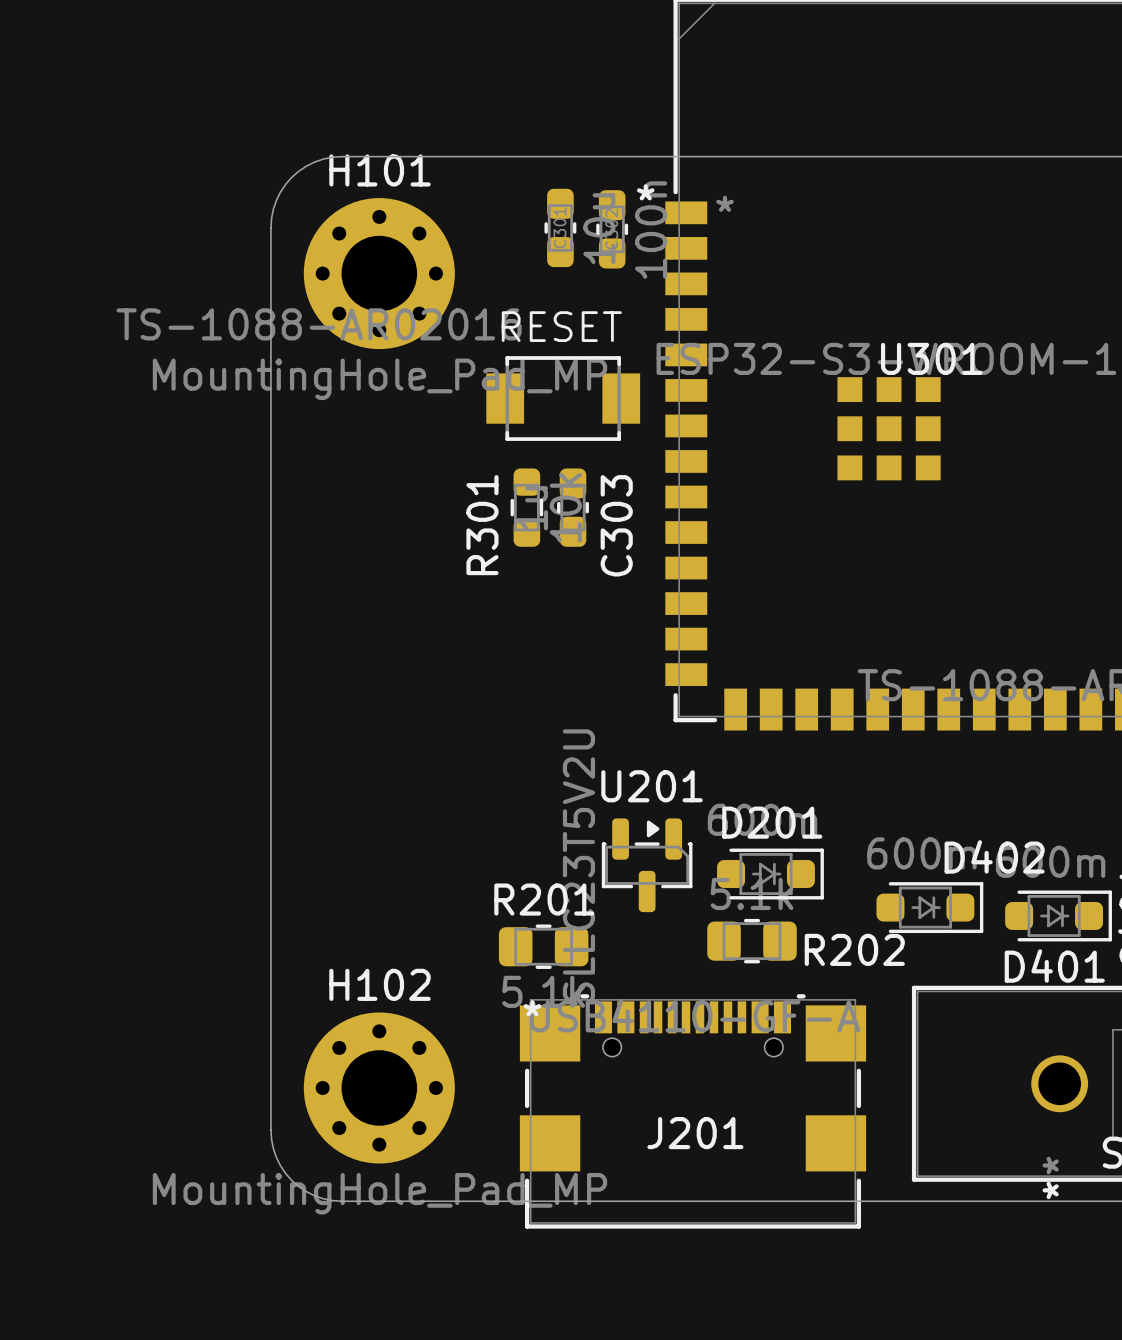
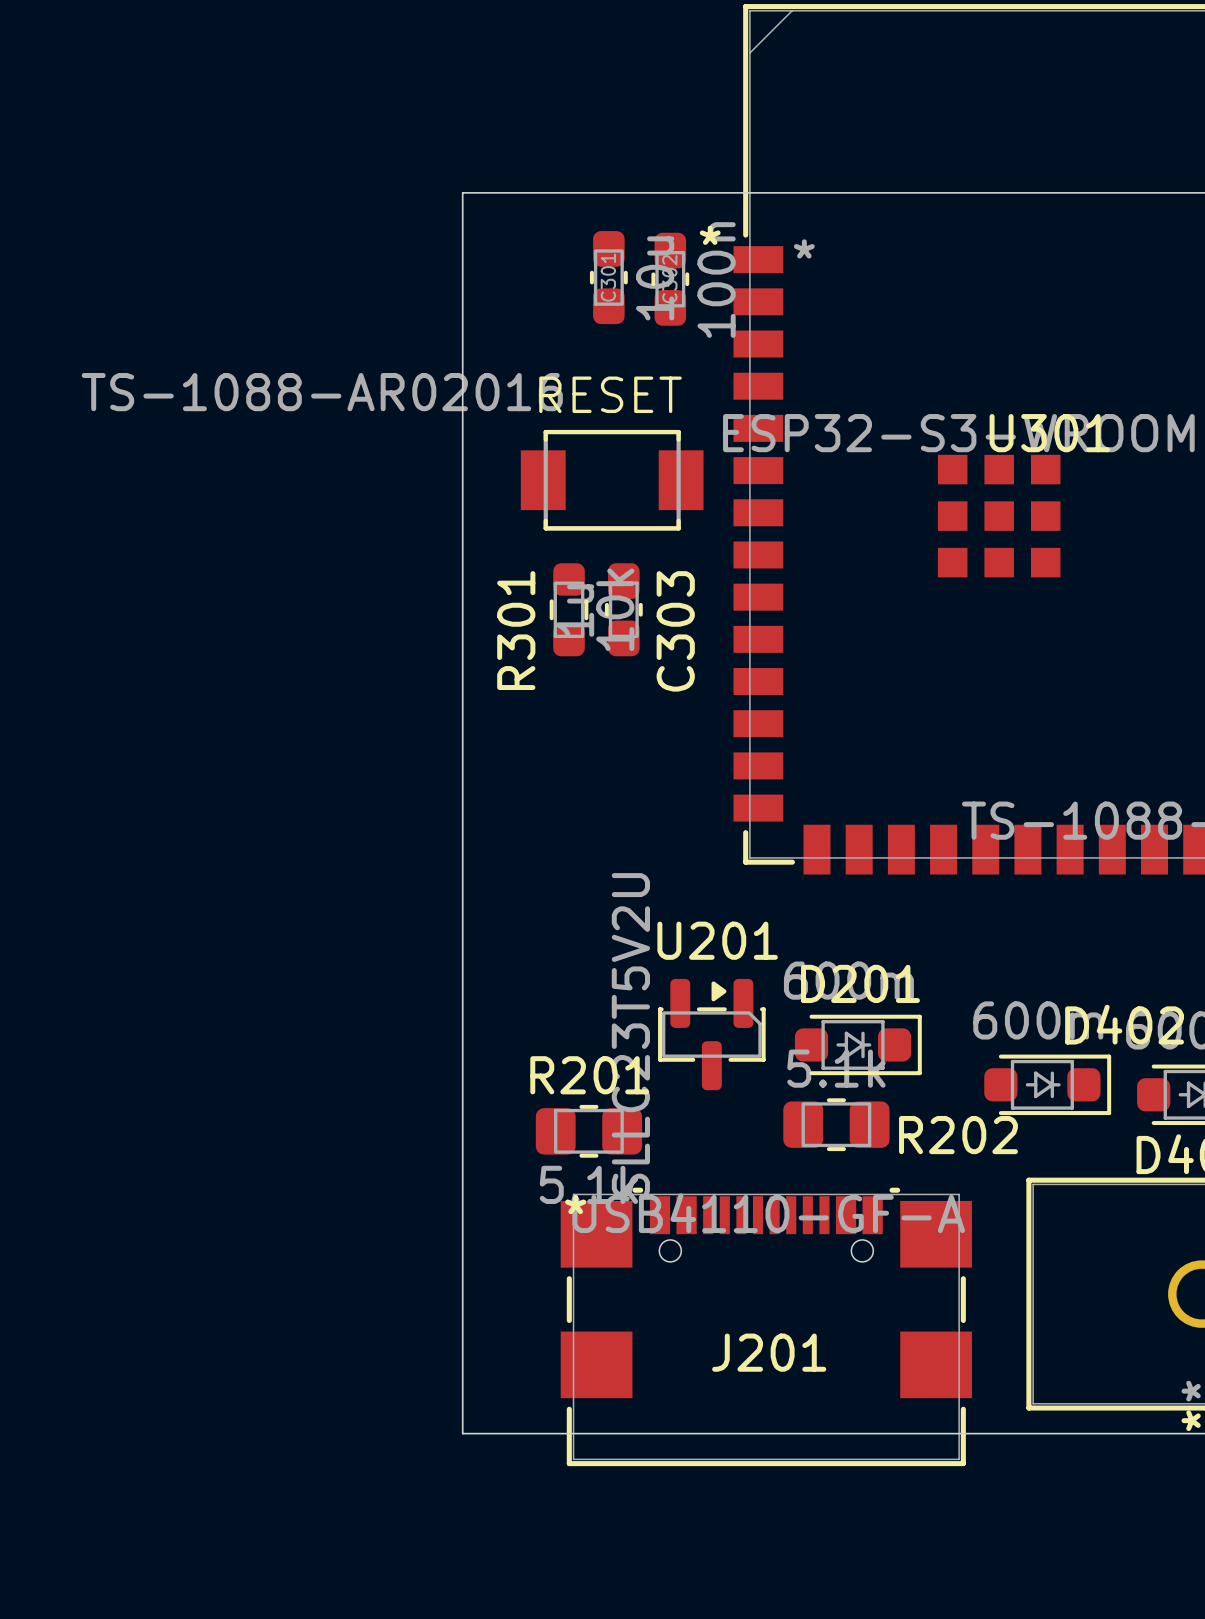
board edge: (437, 156) (341, 156) (314, 162) (298, 171) (285, 184) (276, 200) (270, 227) (271, 1139) (276, 1157) (285, 1173) (298, 1186) (314, 1195) (341, 1201) (437, 1201) -> (462, 192) (462, 1433)
H101: MountingHole_Pad_MP (379, 273) -> none
H102: MountingHole_Pad_MP (379, 1087) -> none

